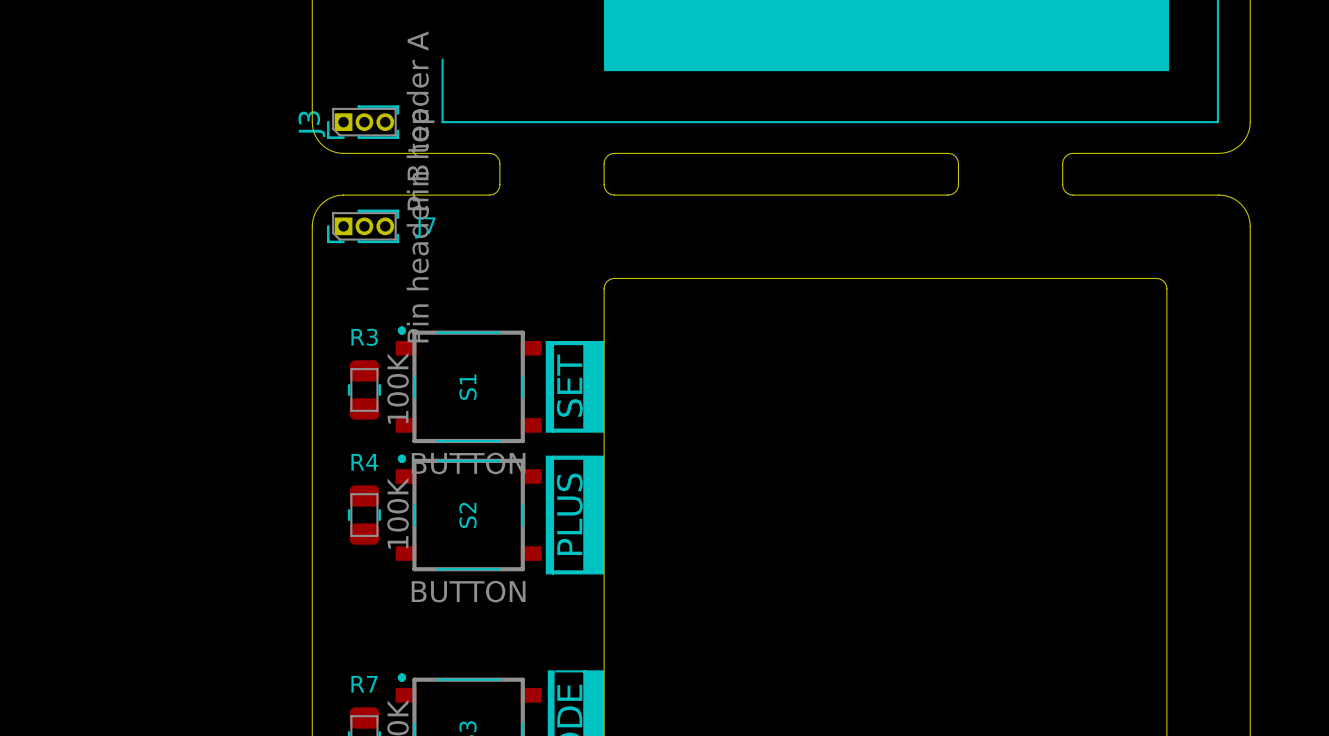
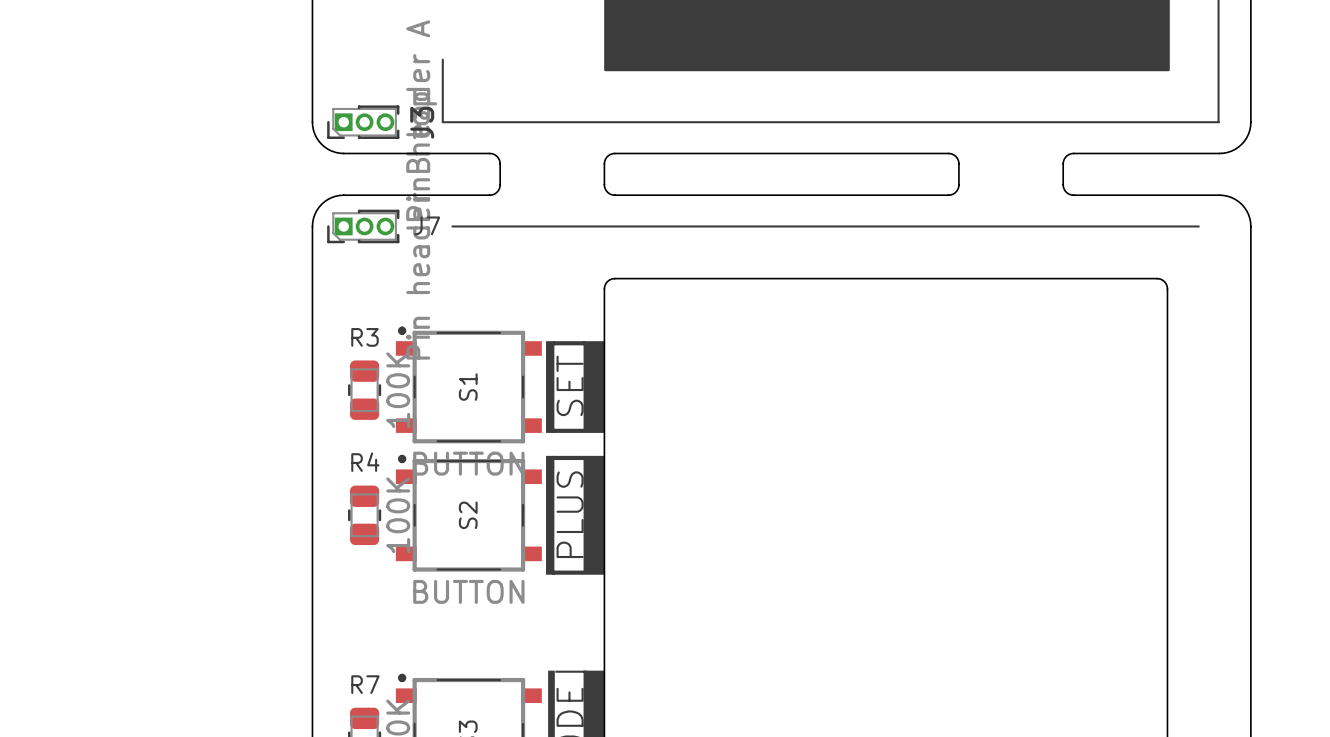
J3 name position: J3 (311, 124) -> J3 (422, 122)
line: none -> (452, 226) (1198, 226)

